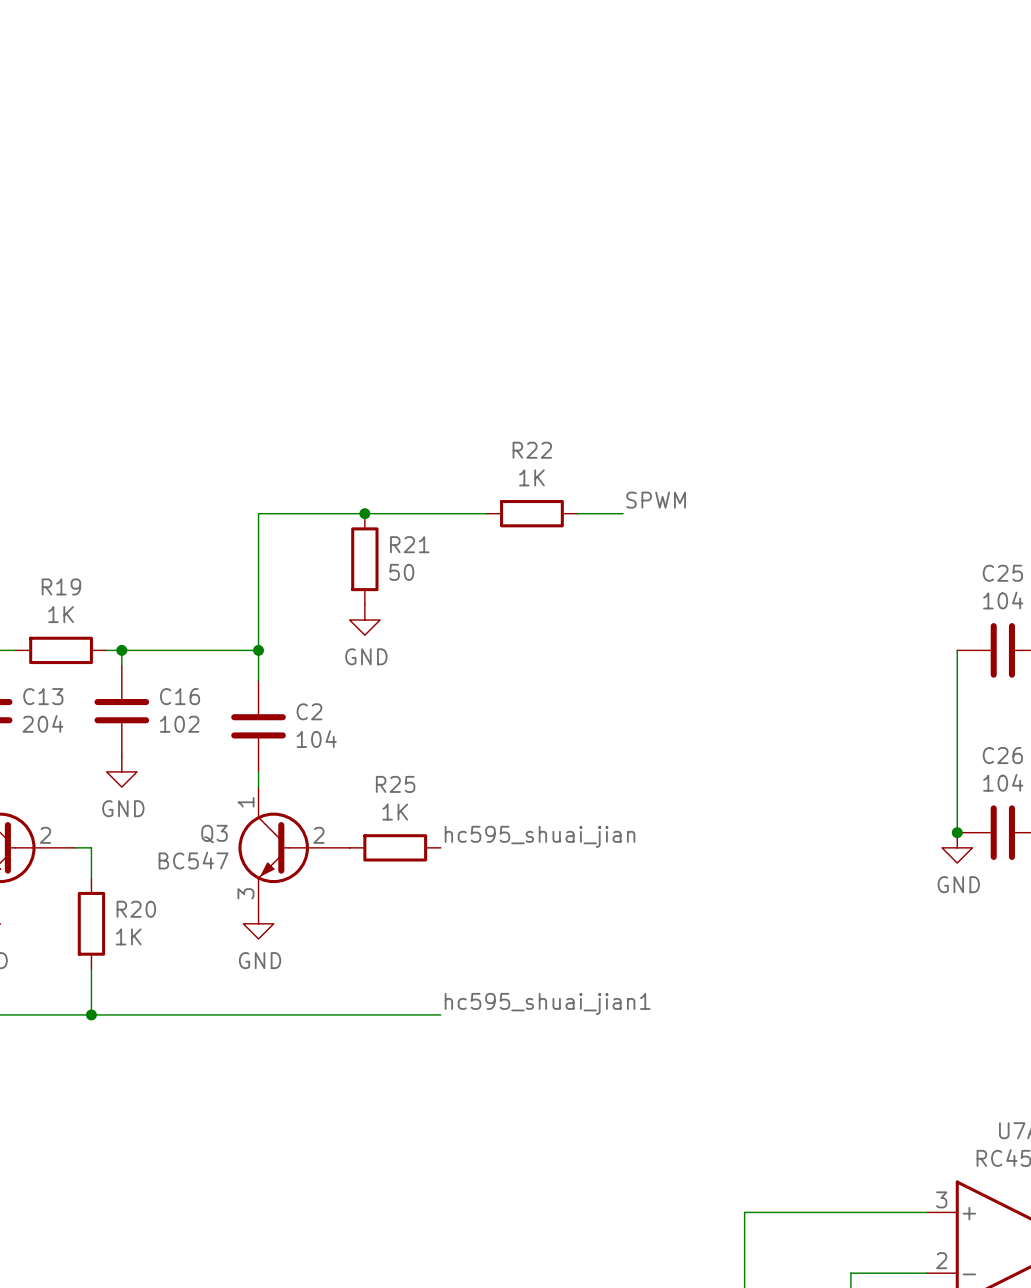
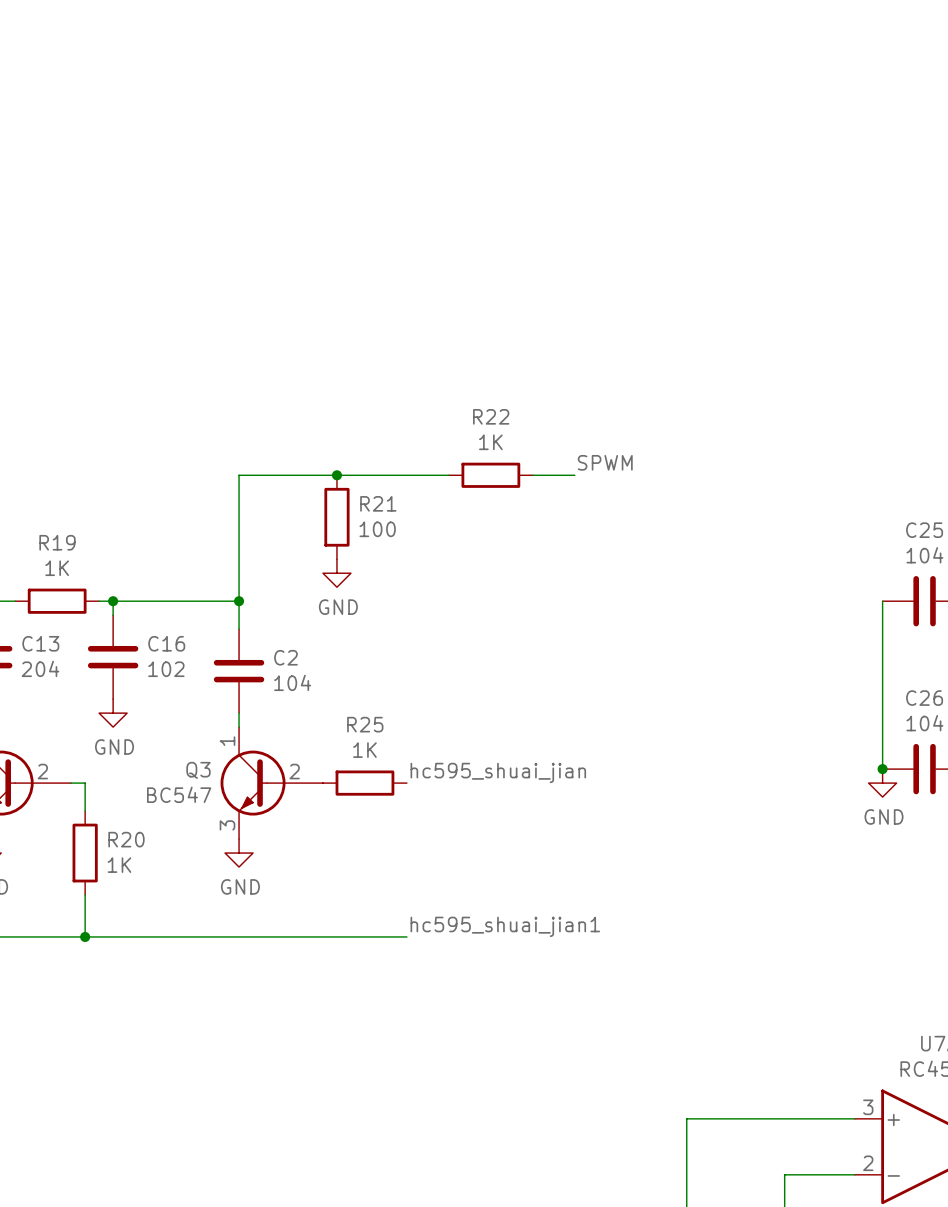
R21 value: 50 (401, 572) -> 100 (377, 529)

